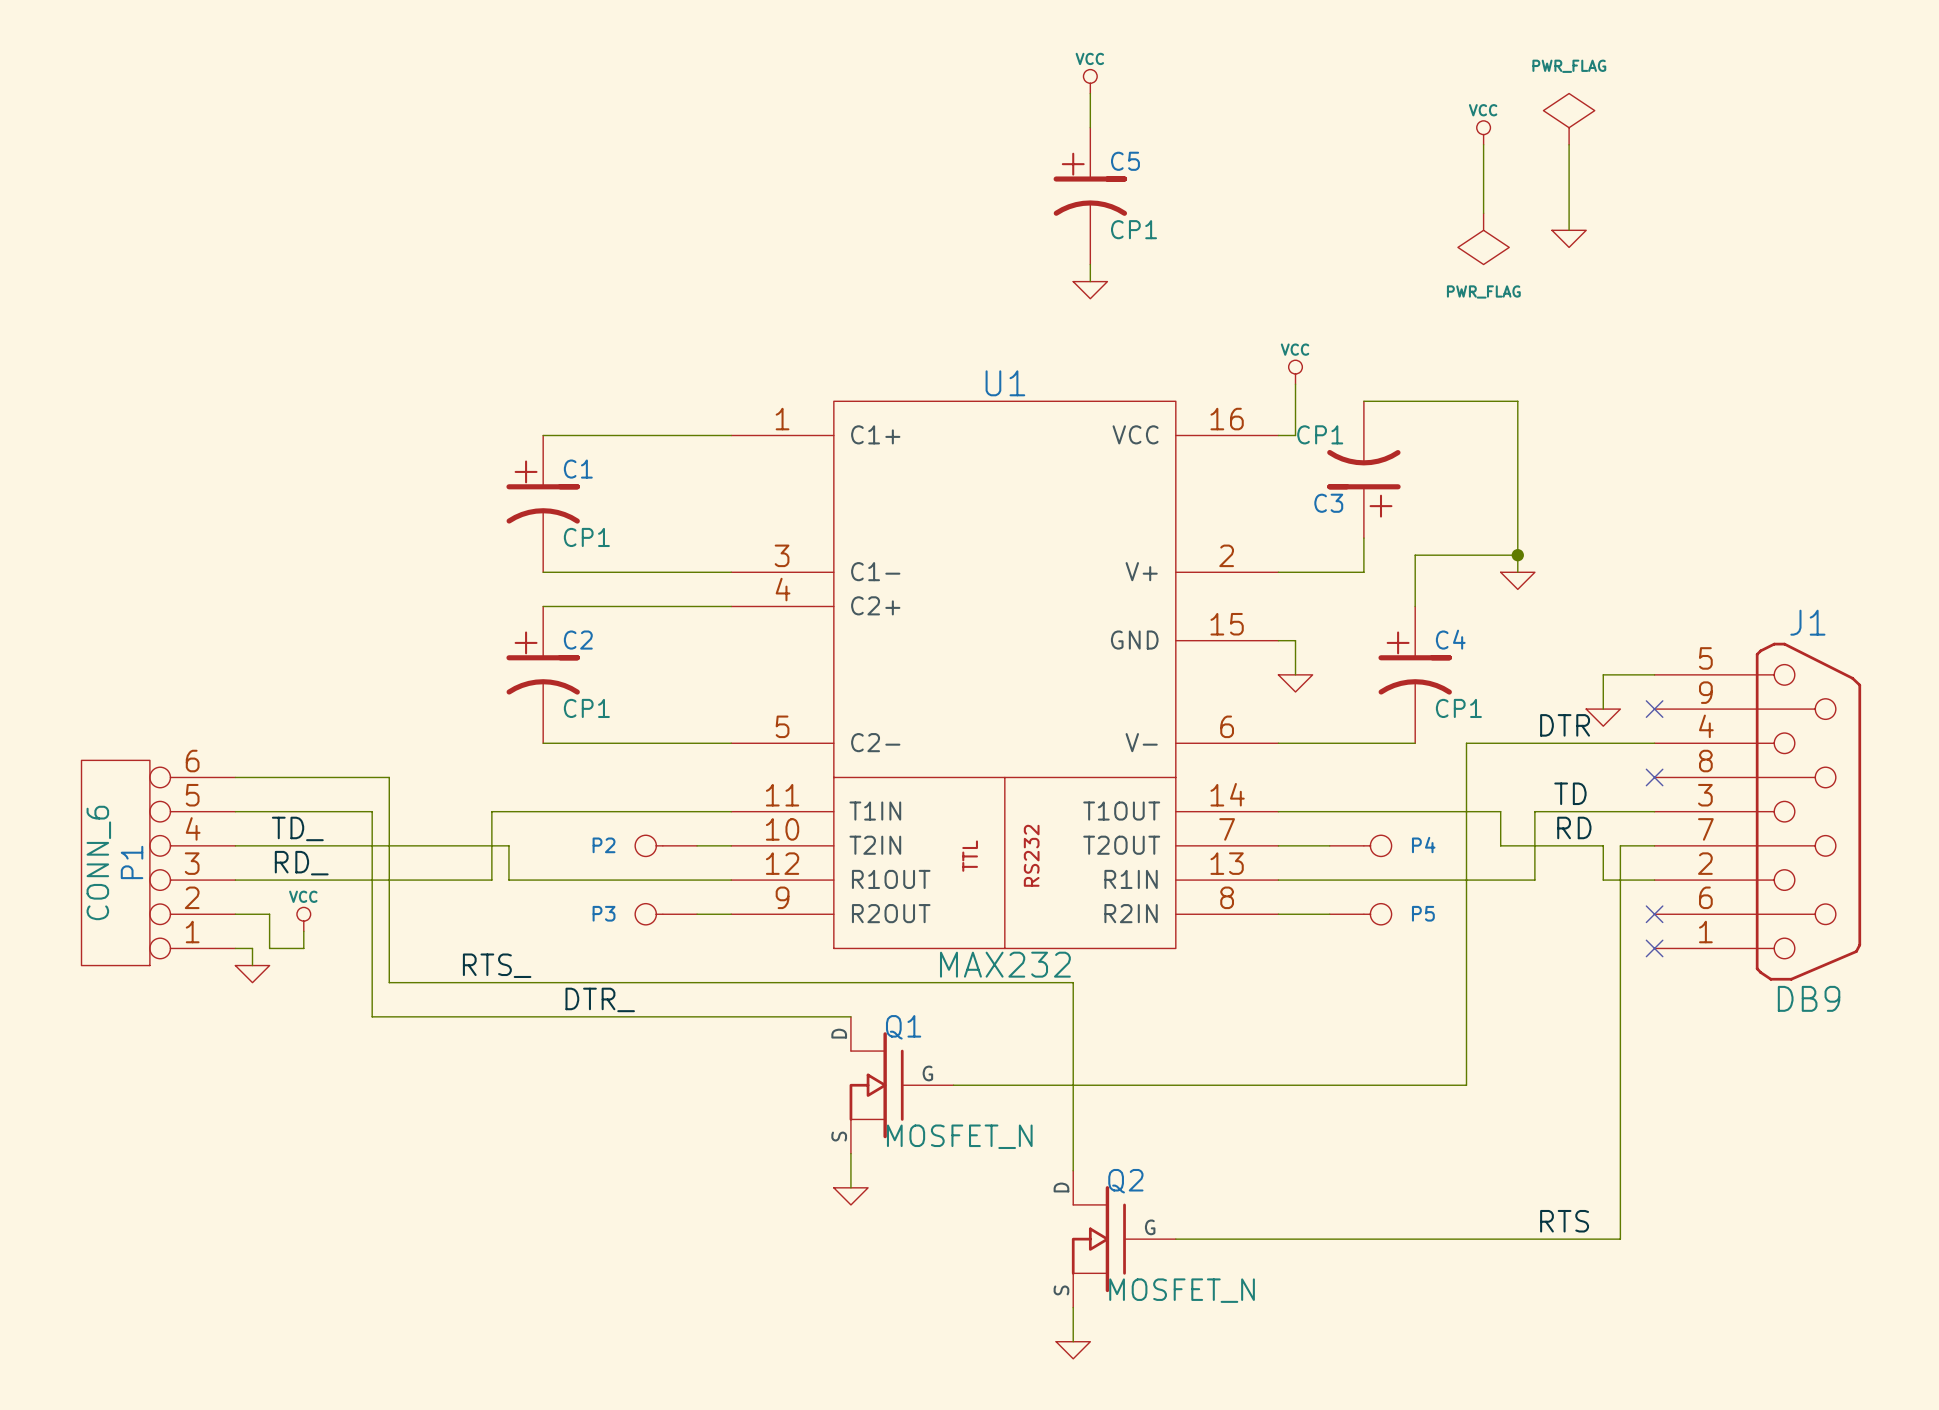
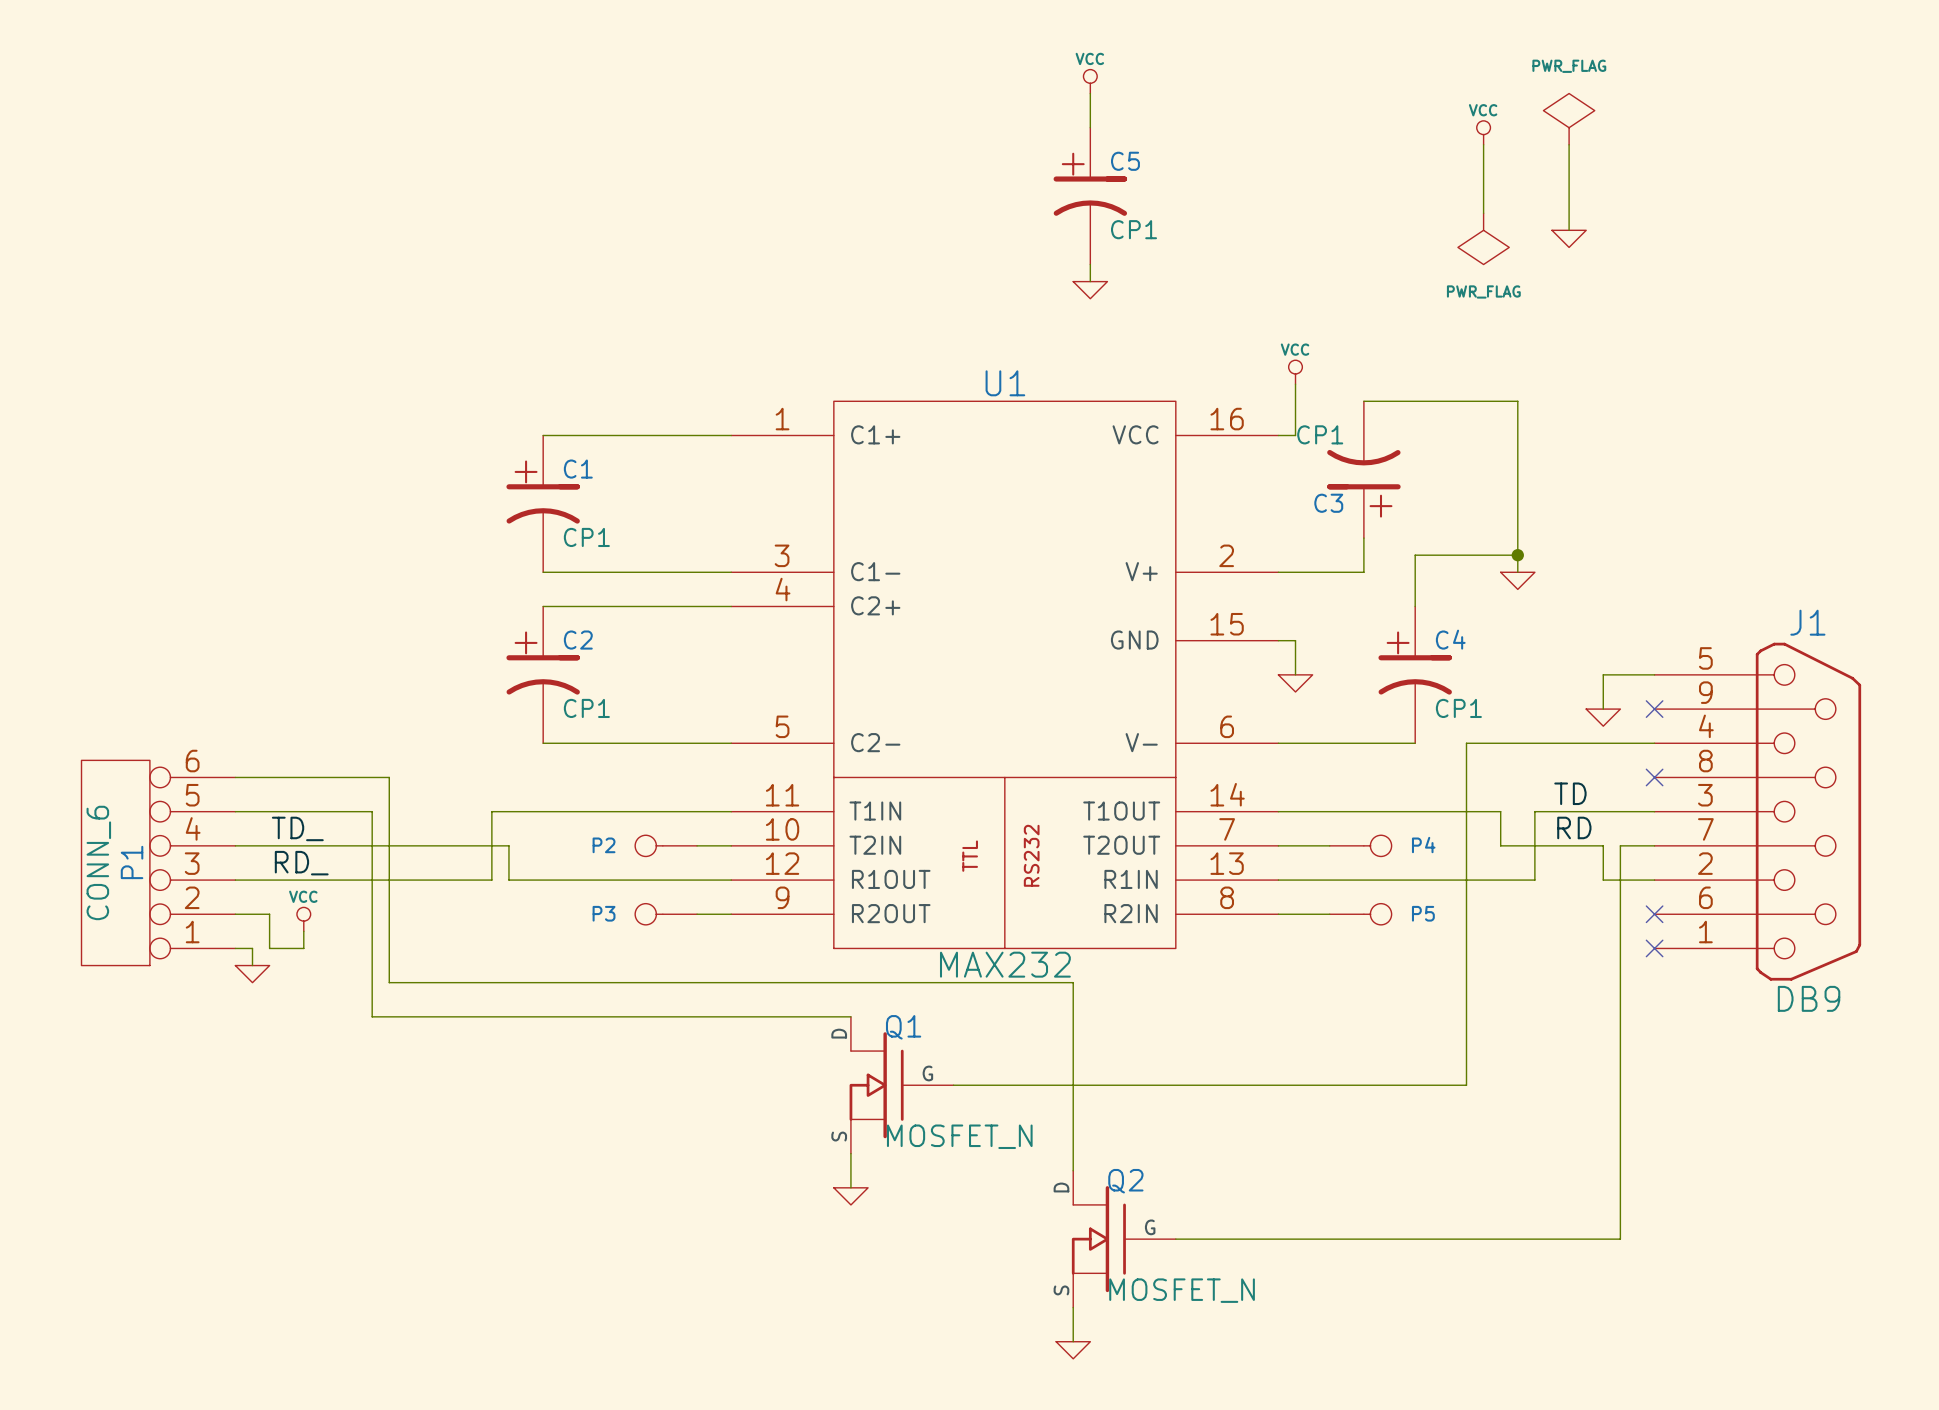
label: DTR (1565, 725) -> none
label: RTS_ (497, 965) -> none
label: DTR_ (600, 999) -> none
label: RTS (1564, 1221) -> none

